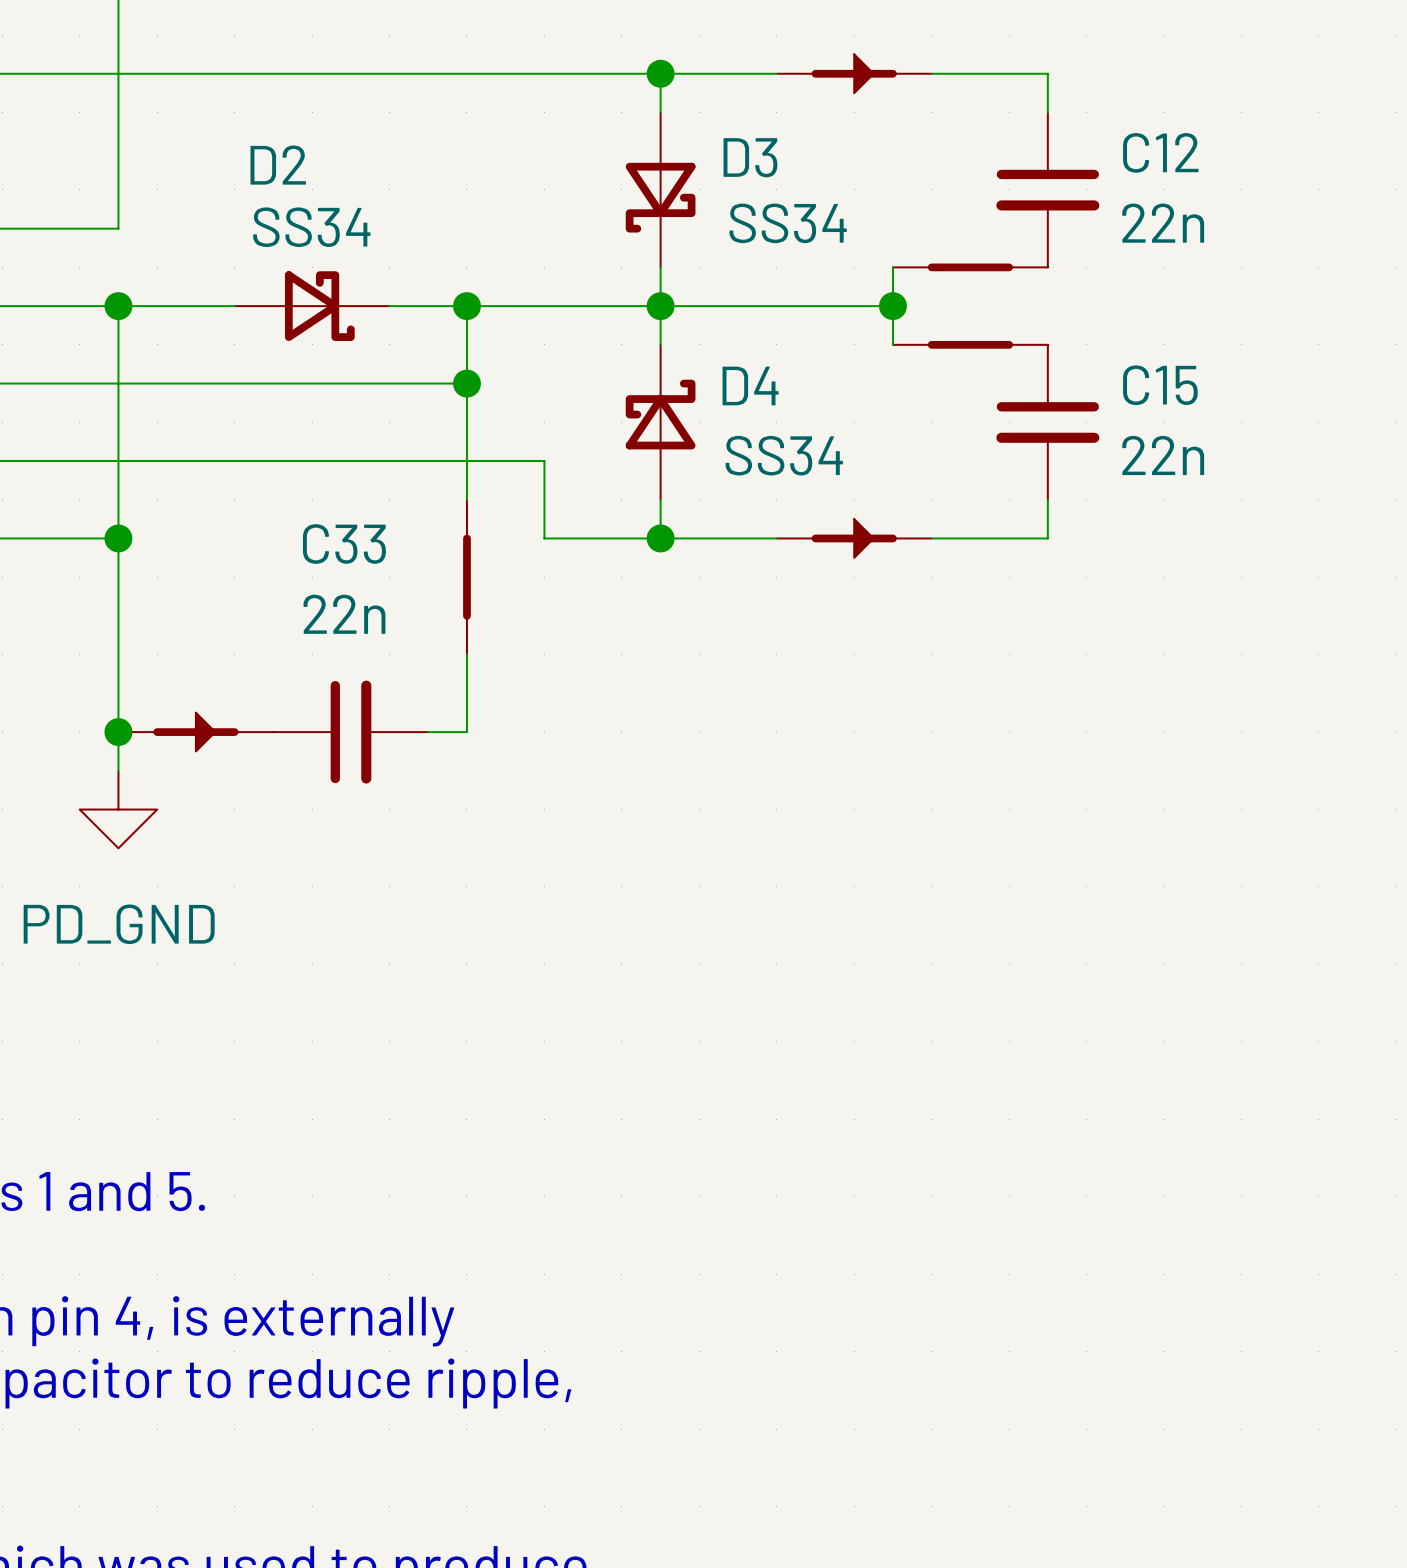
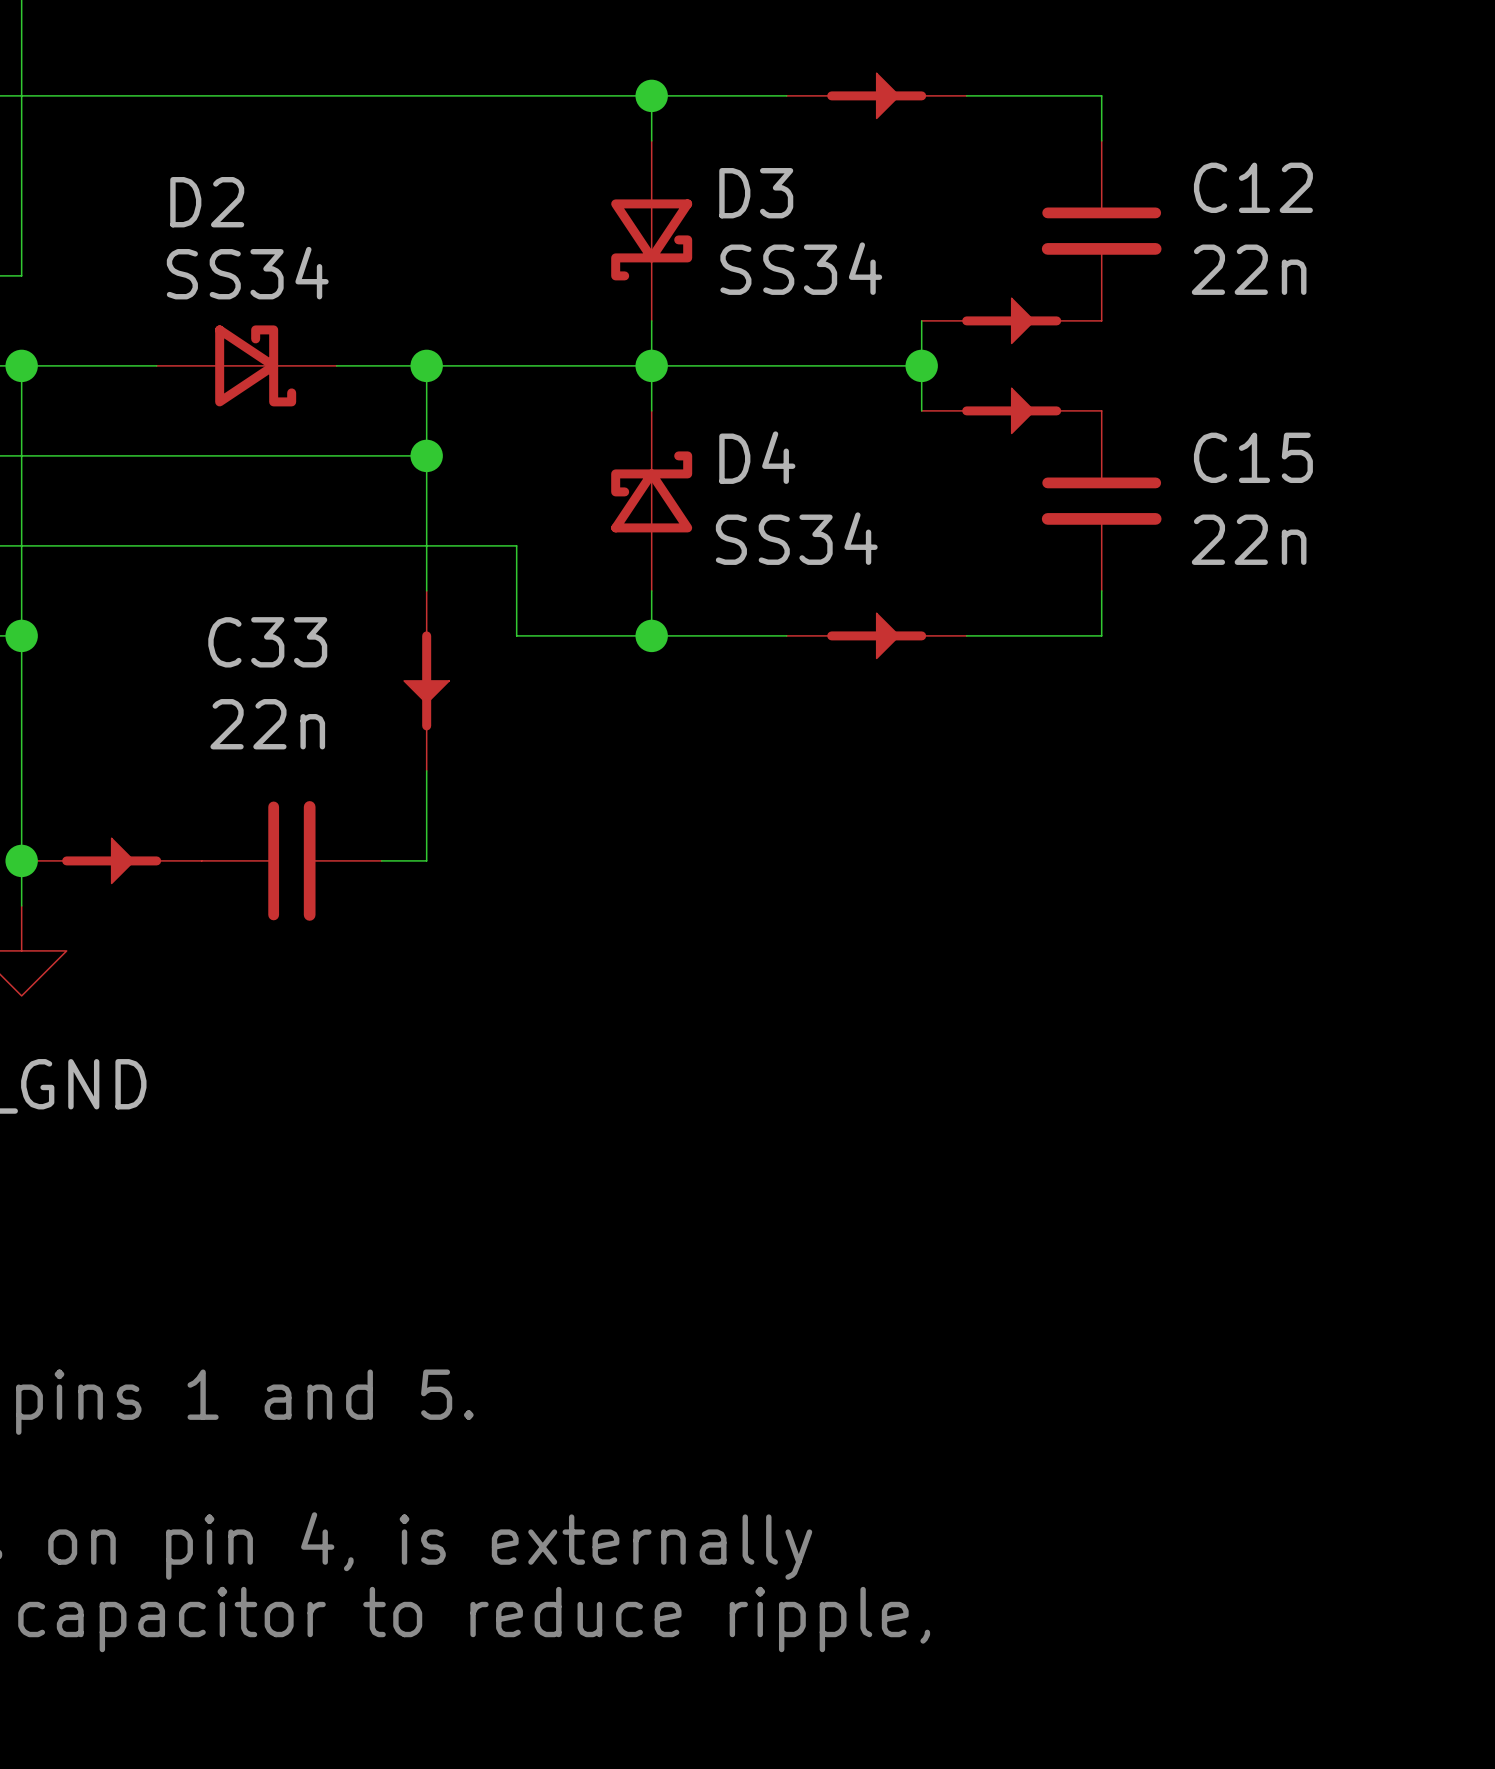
part symbol: [892, 263, 1048, 272] -> [921, 298, 1102, 344]
part symbol: [892, 340, 1048, 349] -> [921, 388, 1102, 434]
part symbol: [463, 499, 471, 655] -> [404, 590, 450, 771]

